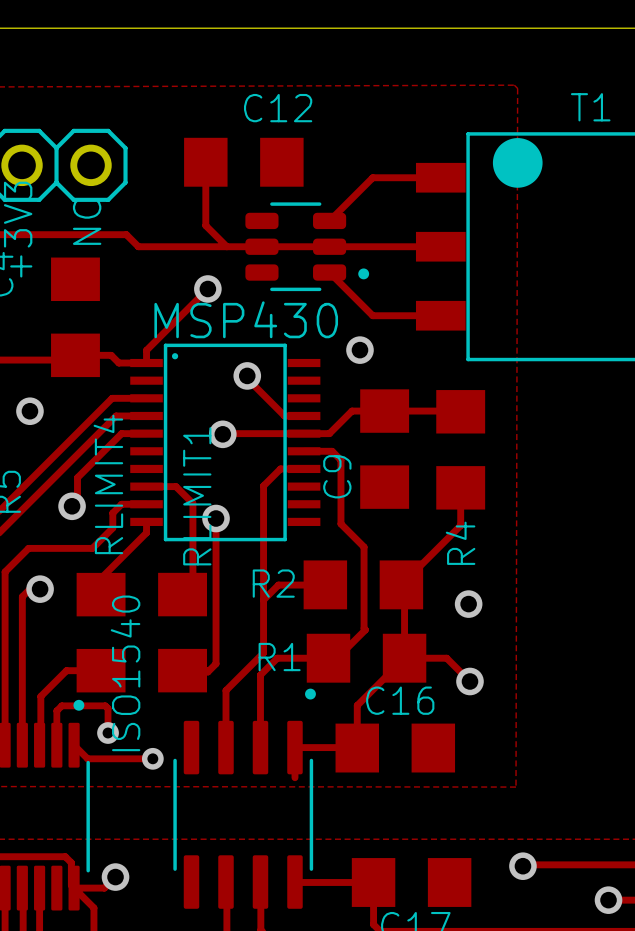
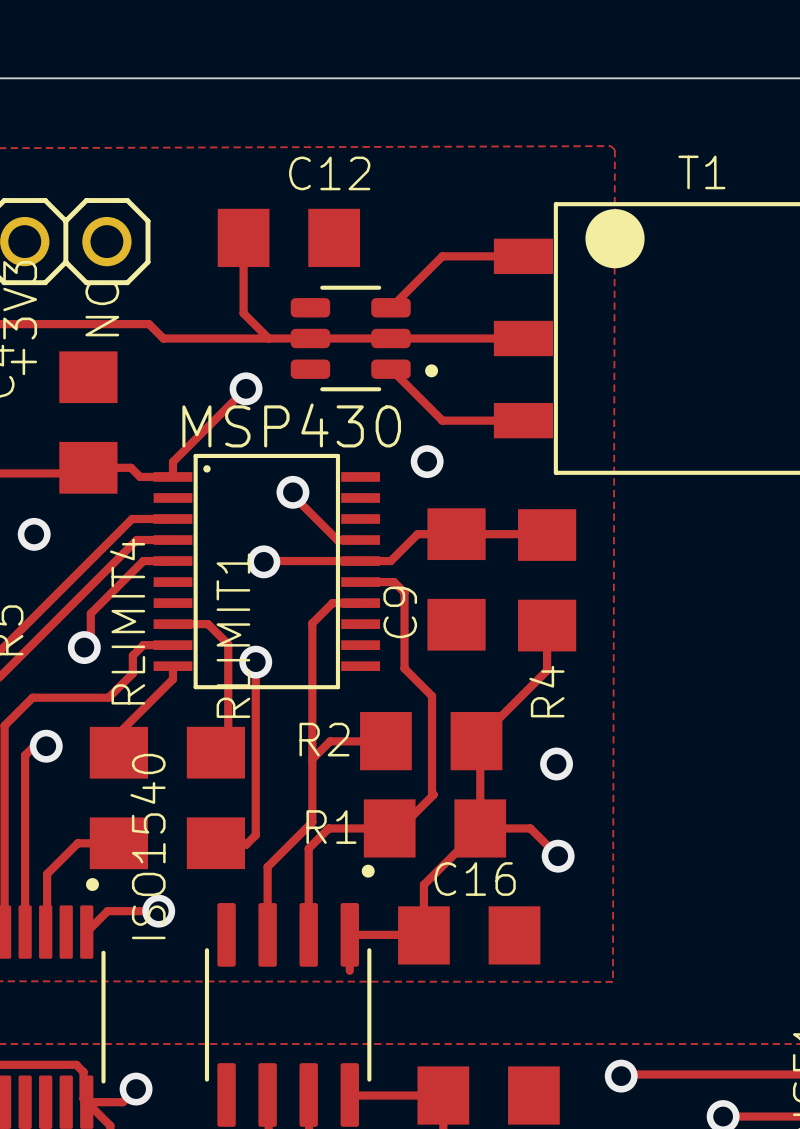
via: none -> (158, 911)
track: (108, 733) (108, 708) (105, 705) (61, 705) (56, 710) (56, 745) -> none
via: (108, 733) -> none
track: (74, 745) (87, 758) (152, 758) -> (86, 932) (107, 911) (158, 911)
via: (152, 758) -> none

